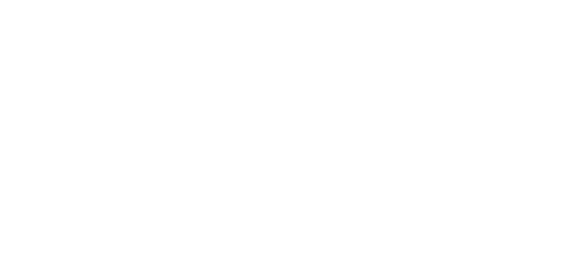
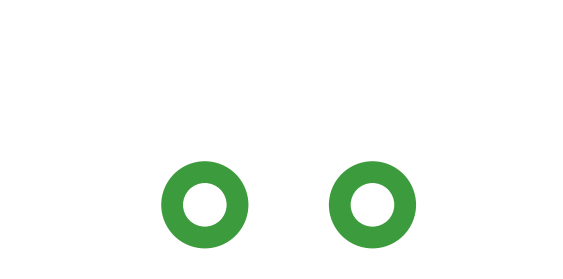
part: none -> (288, 204)

